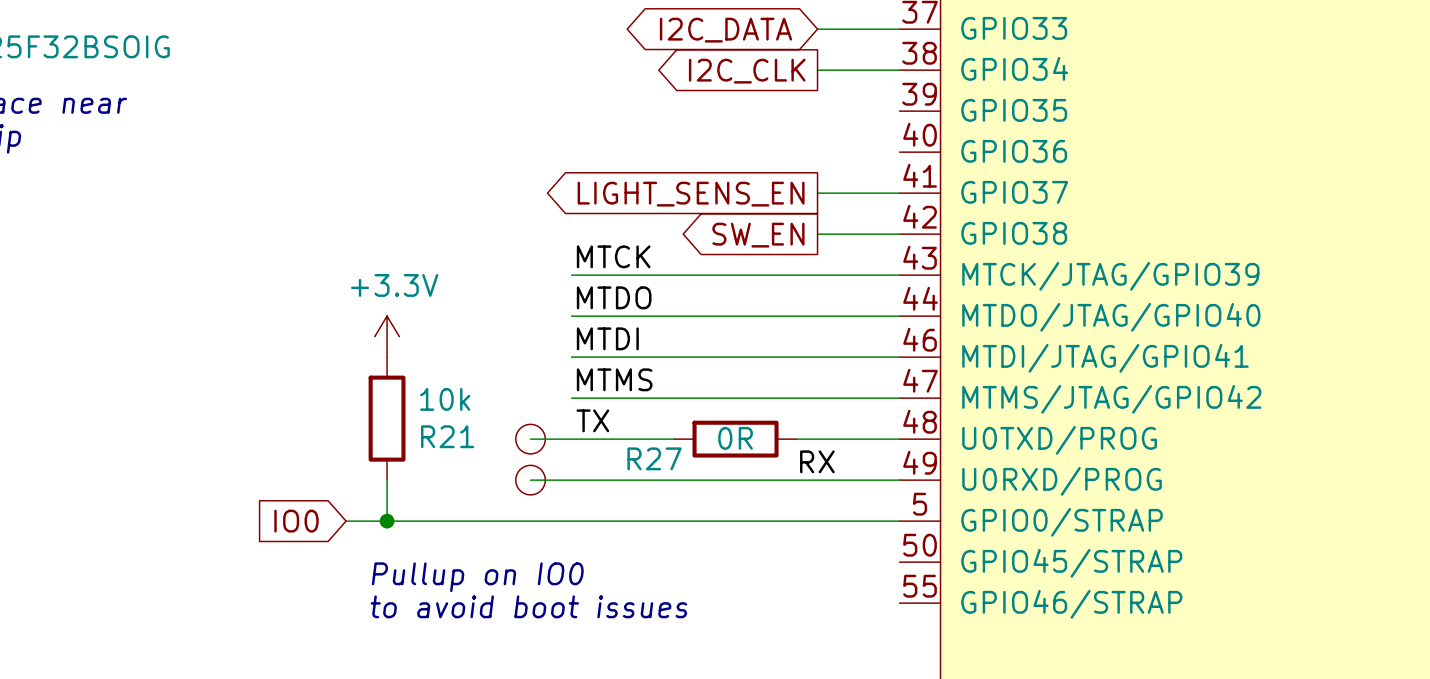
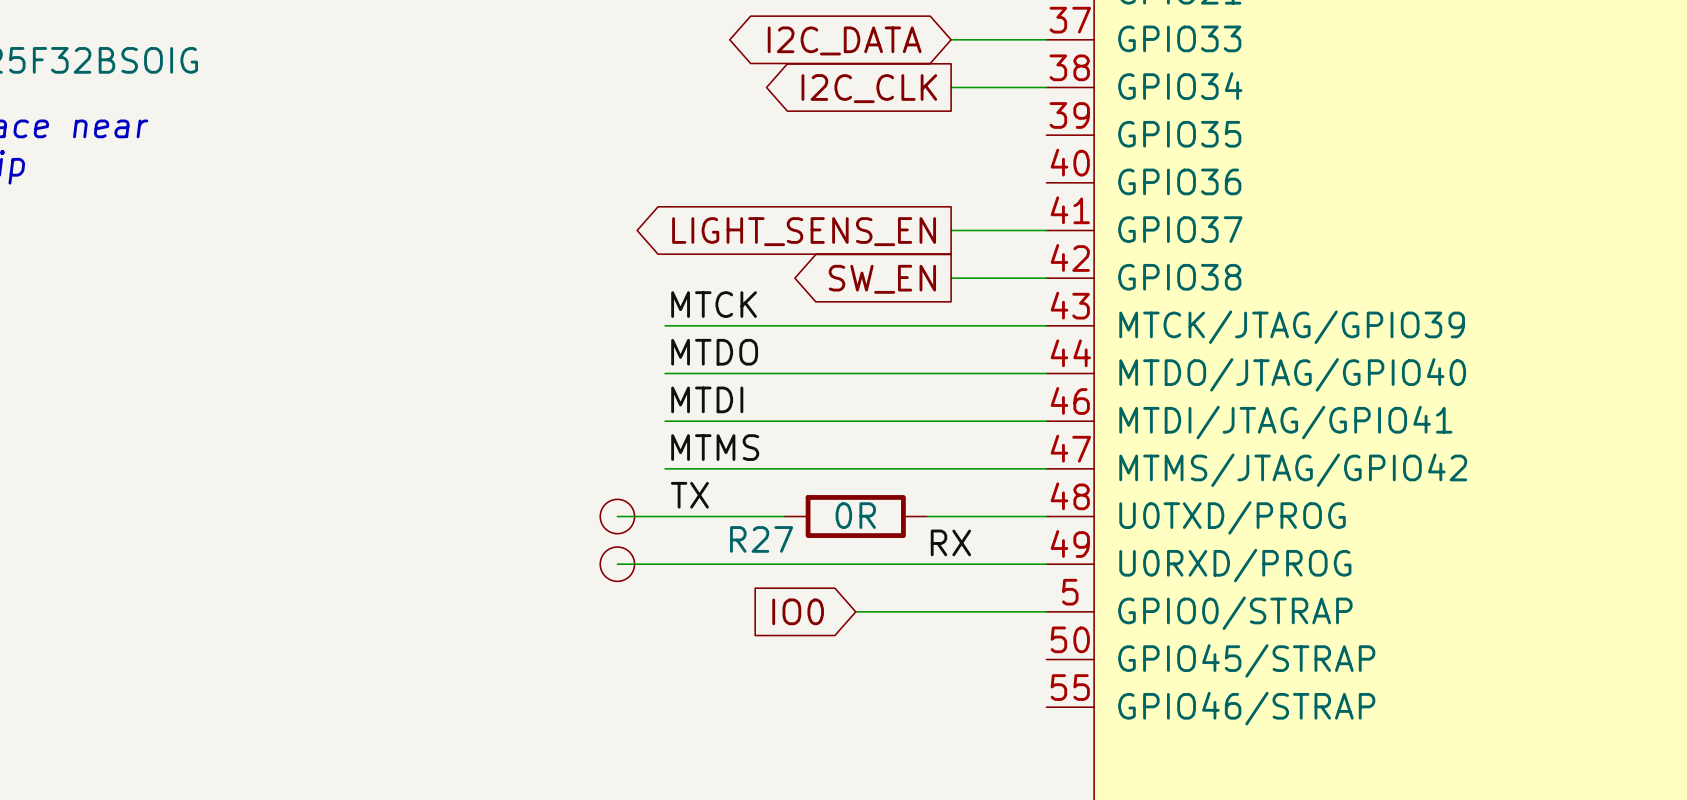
power symbol: +3.3V (387, 336) -> none
R21: 10k (387, 418) -> none
wire: (387, 480) (387, 521) -> none
global label position: IO0 (296, 521) -> IO0 (798, 611)
wire: (346, 521) (735, 521) -> none
junction: (387, 521) -> none
text: Pullup on IO0 (477, 577) -> none
text: to avoid boot issues (528, 606) -> none

